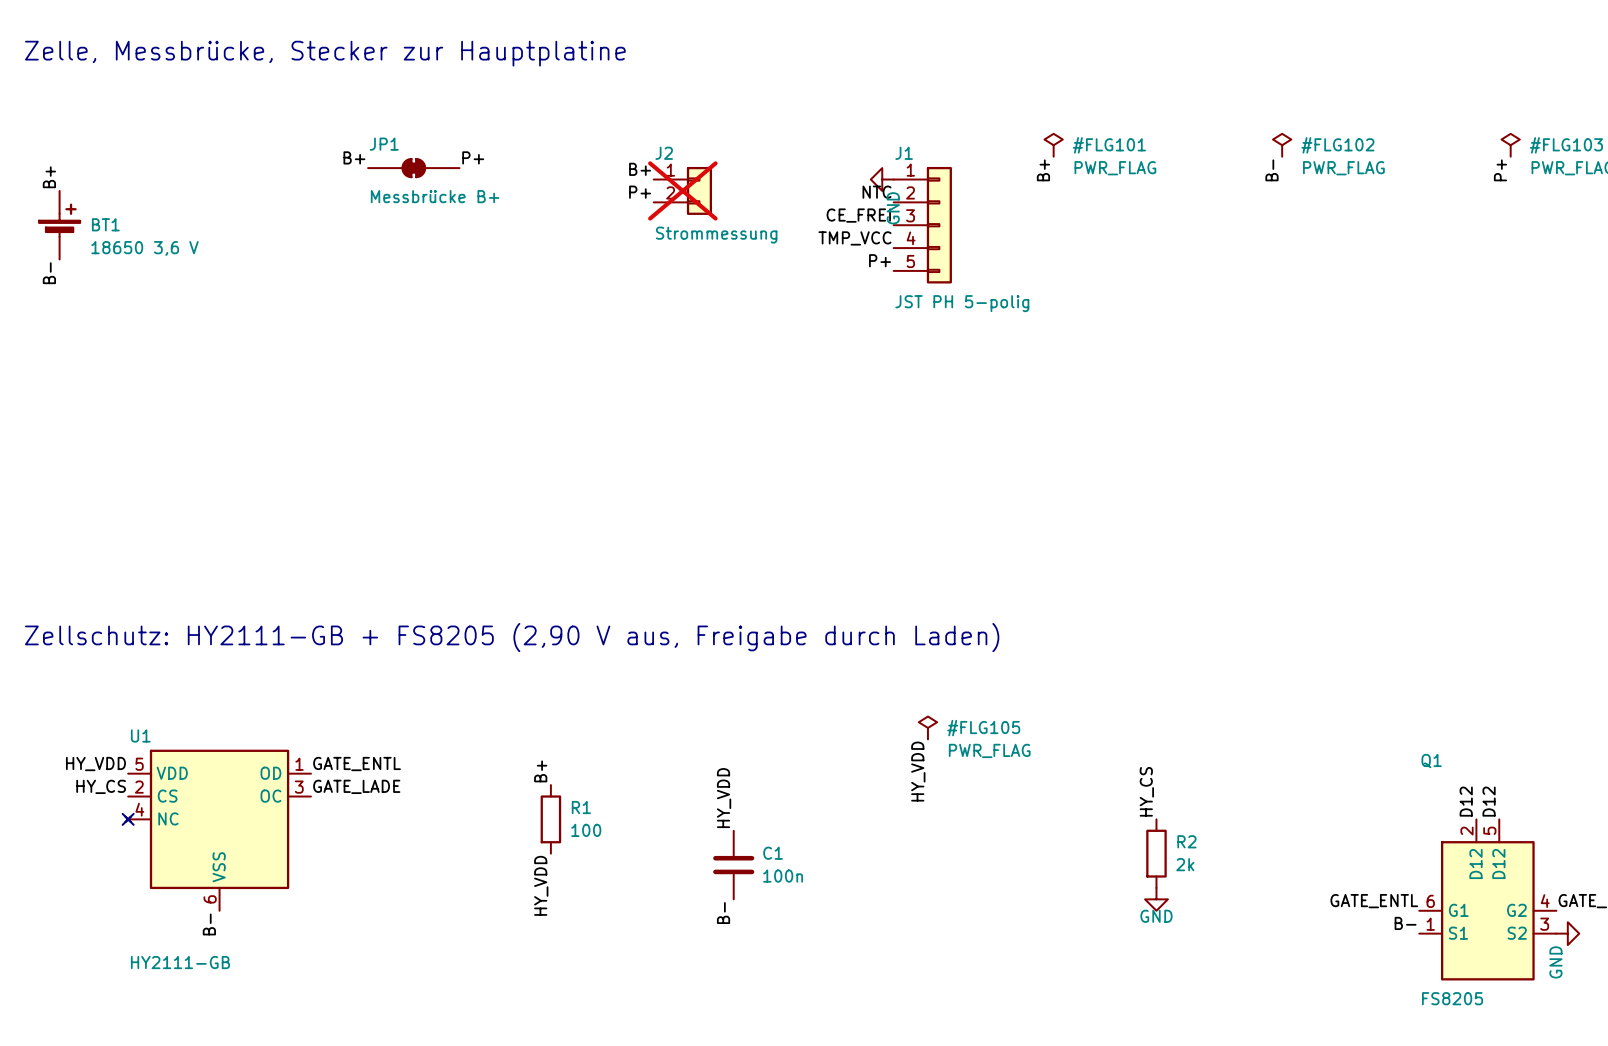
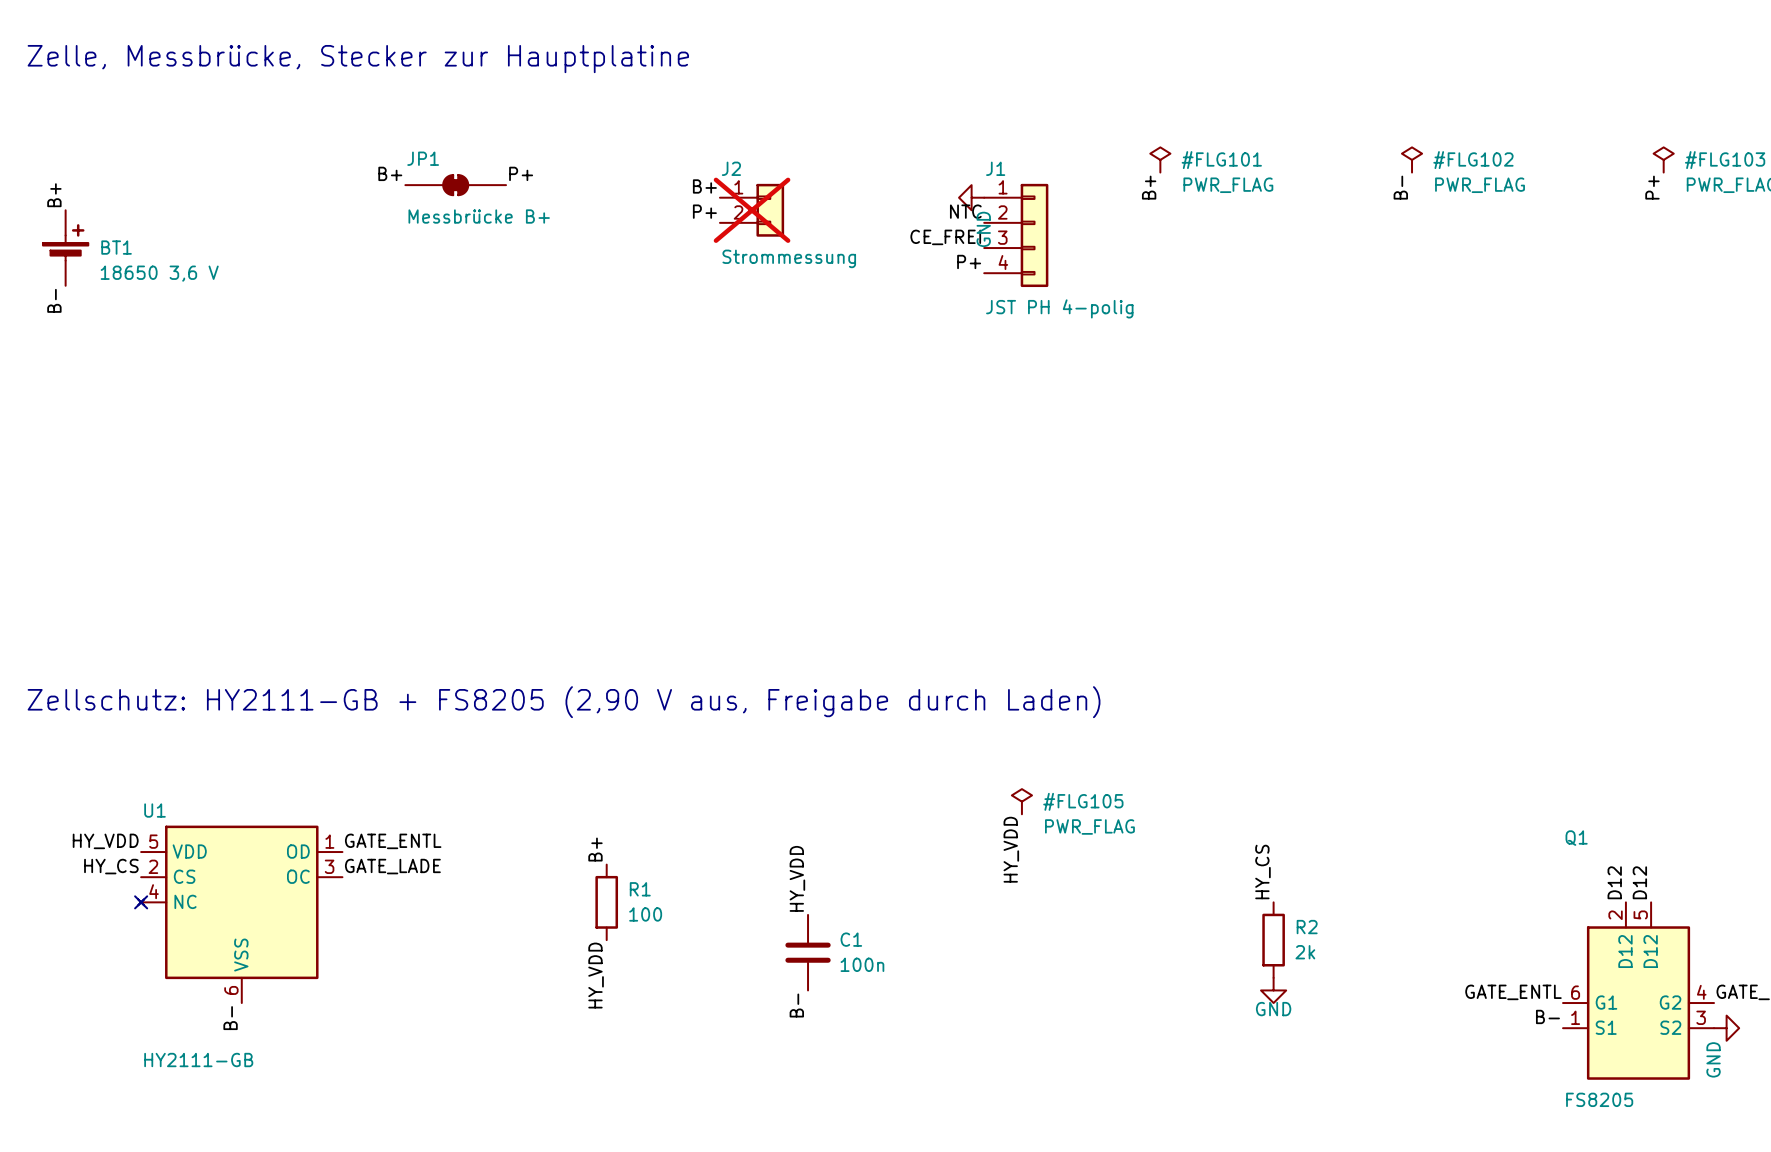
J1 symbol: [893, 166, 952, 284] -> [984, 183, 1049, 288]
label: TMP_VCC (854, 238) -> P+ (969, 261)
label: P+ (879, 260) -> none
J1 value: JST PH 5-polig (962, 303) -> JST PH 4-polig (1059, 308)

